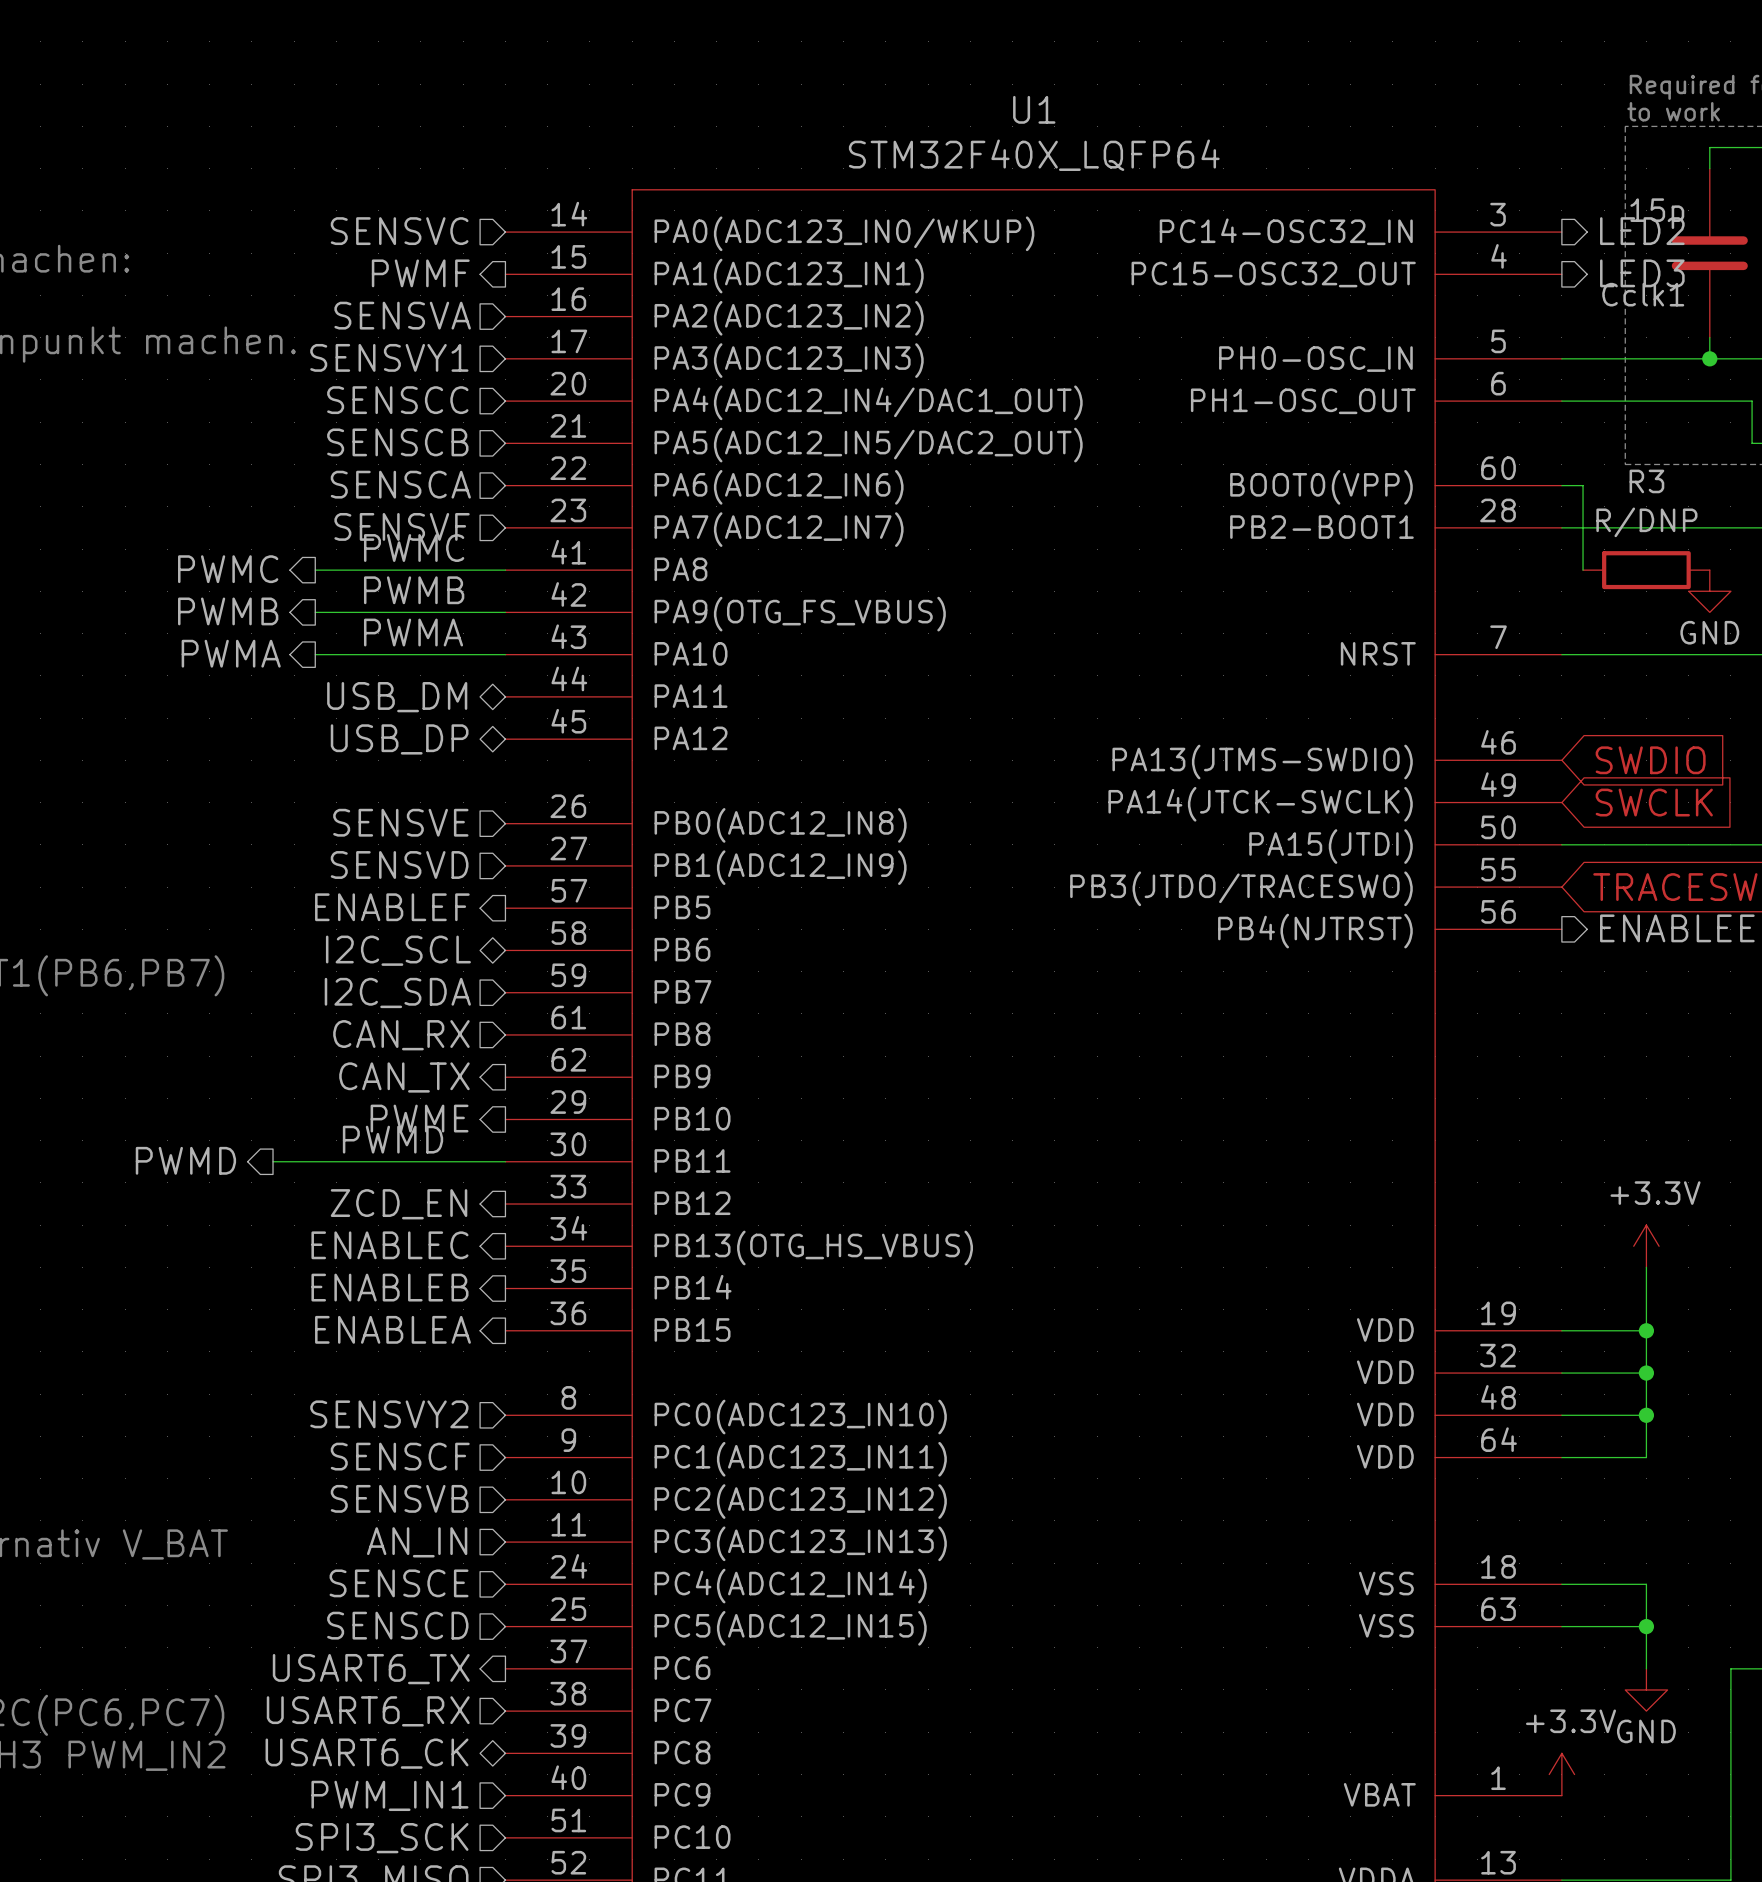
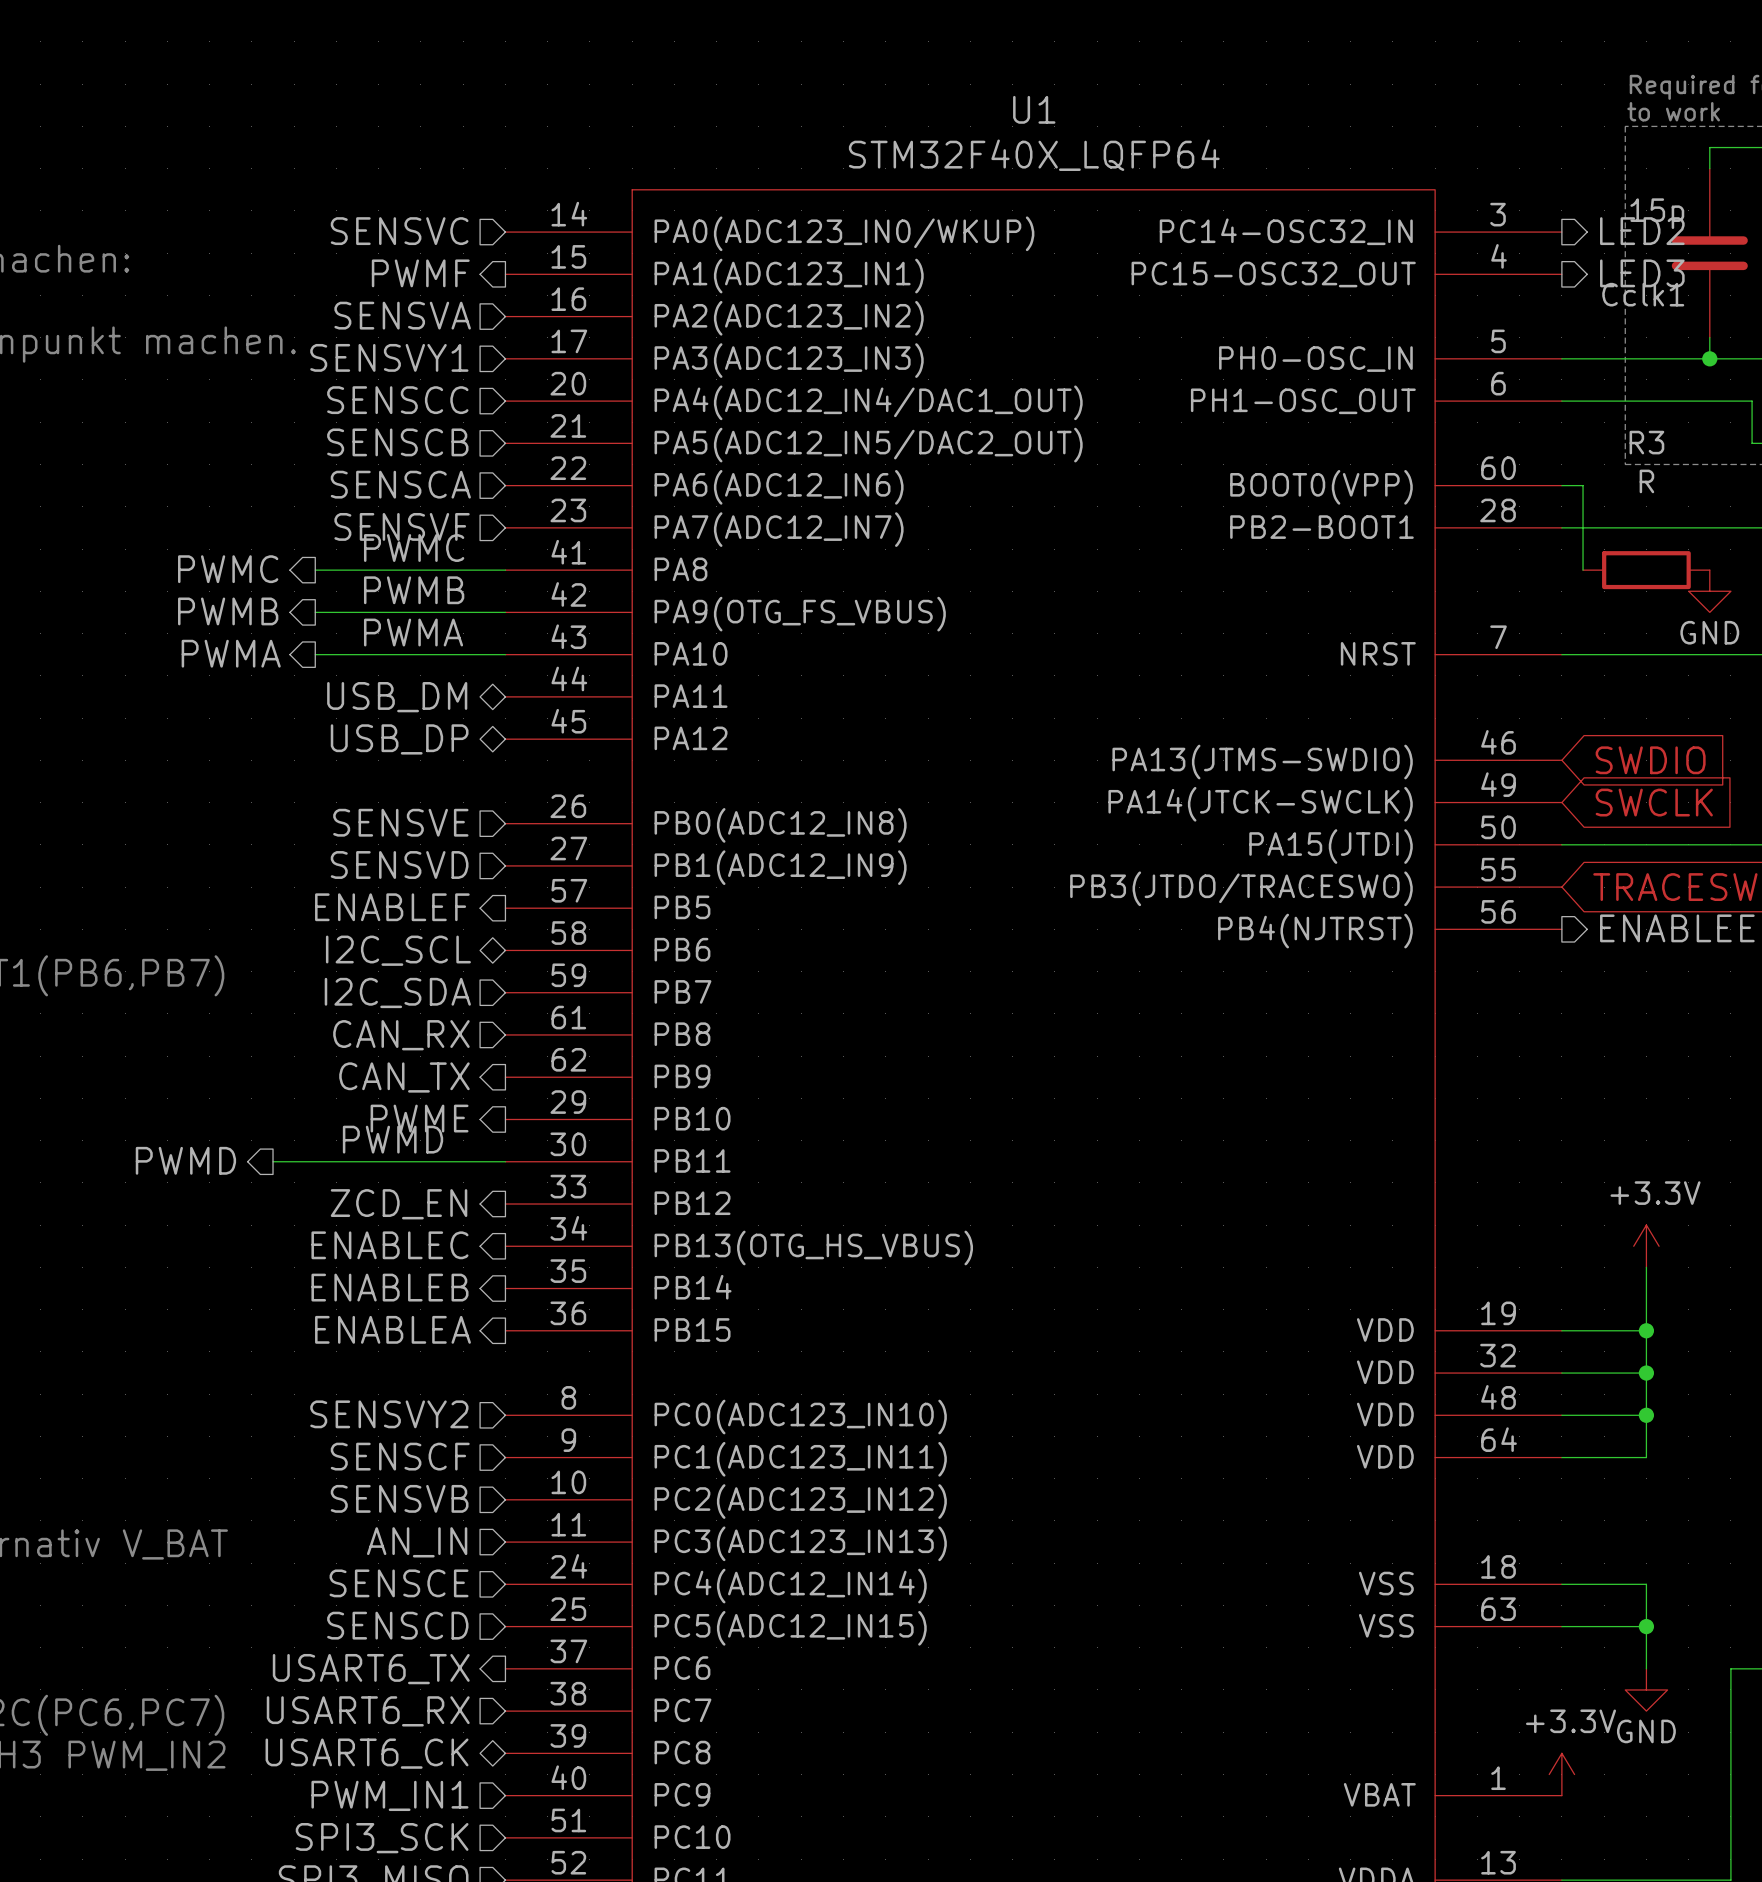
R3 name position: R3 (1646, 481) -> R3 (1646, 442)
R3 value: R/DNP (1646, 522) -> R (1646, 481)

